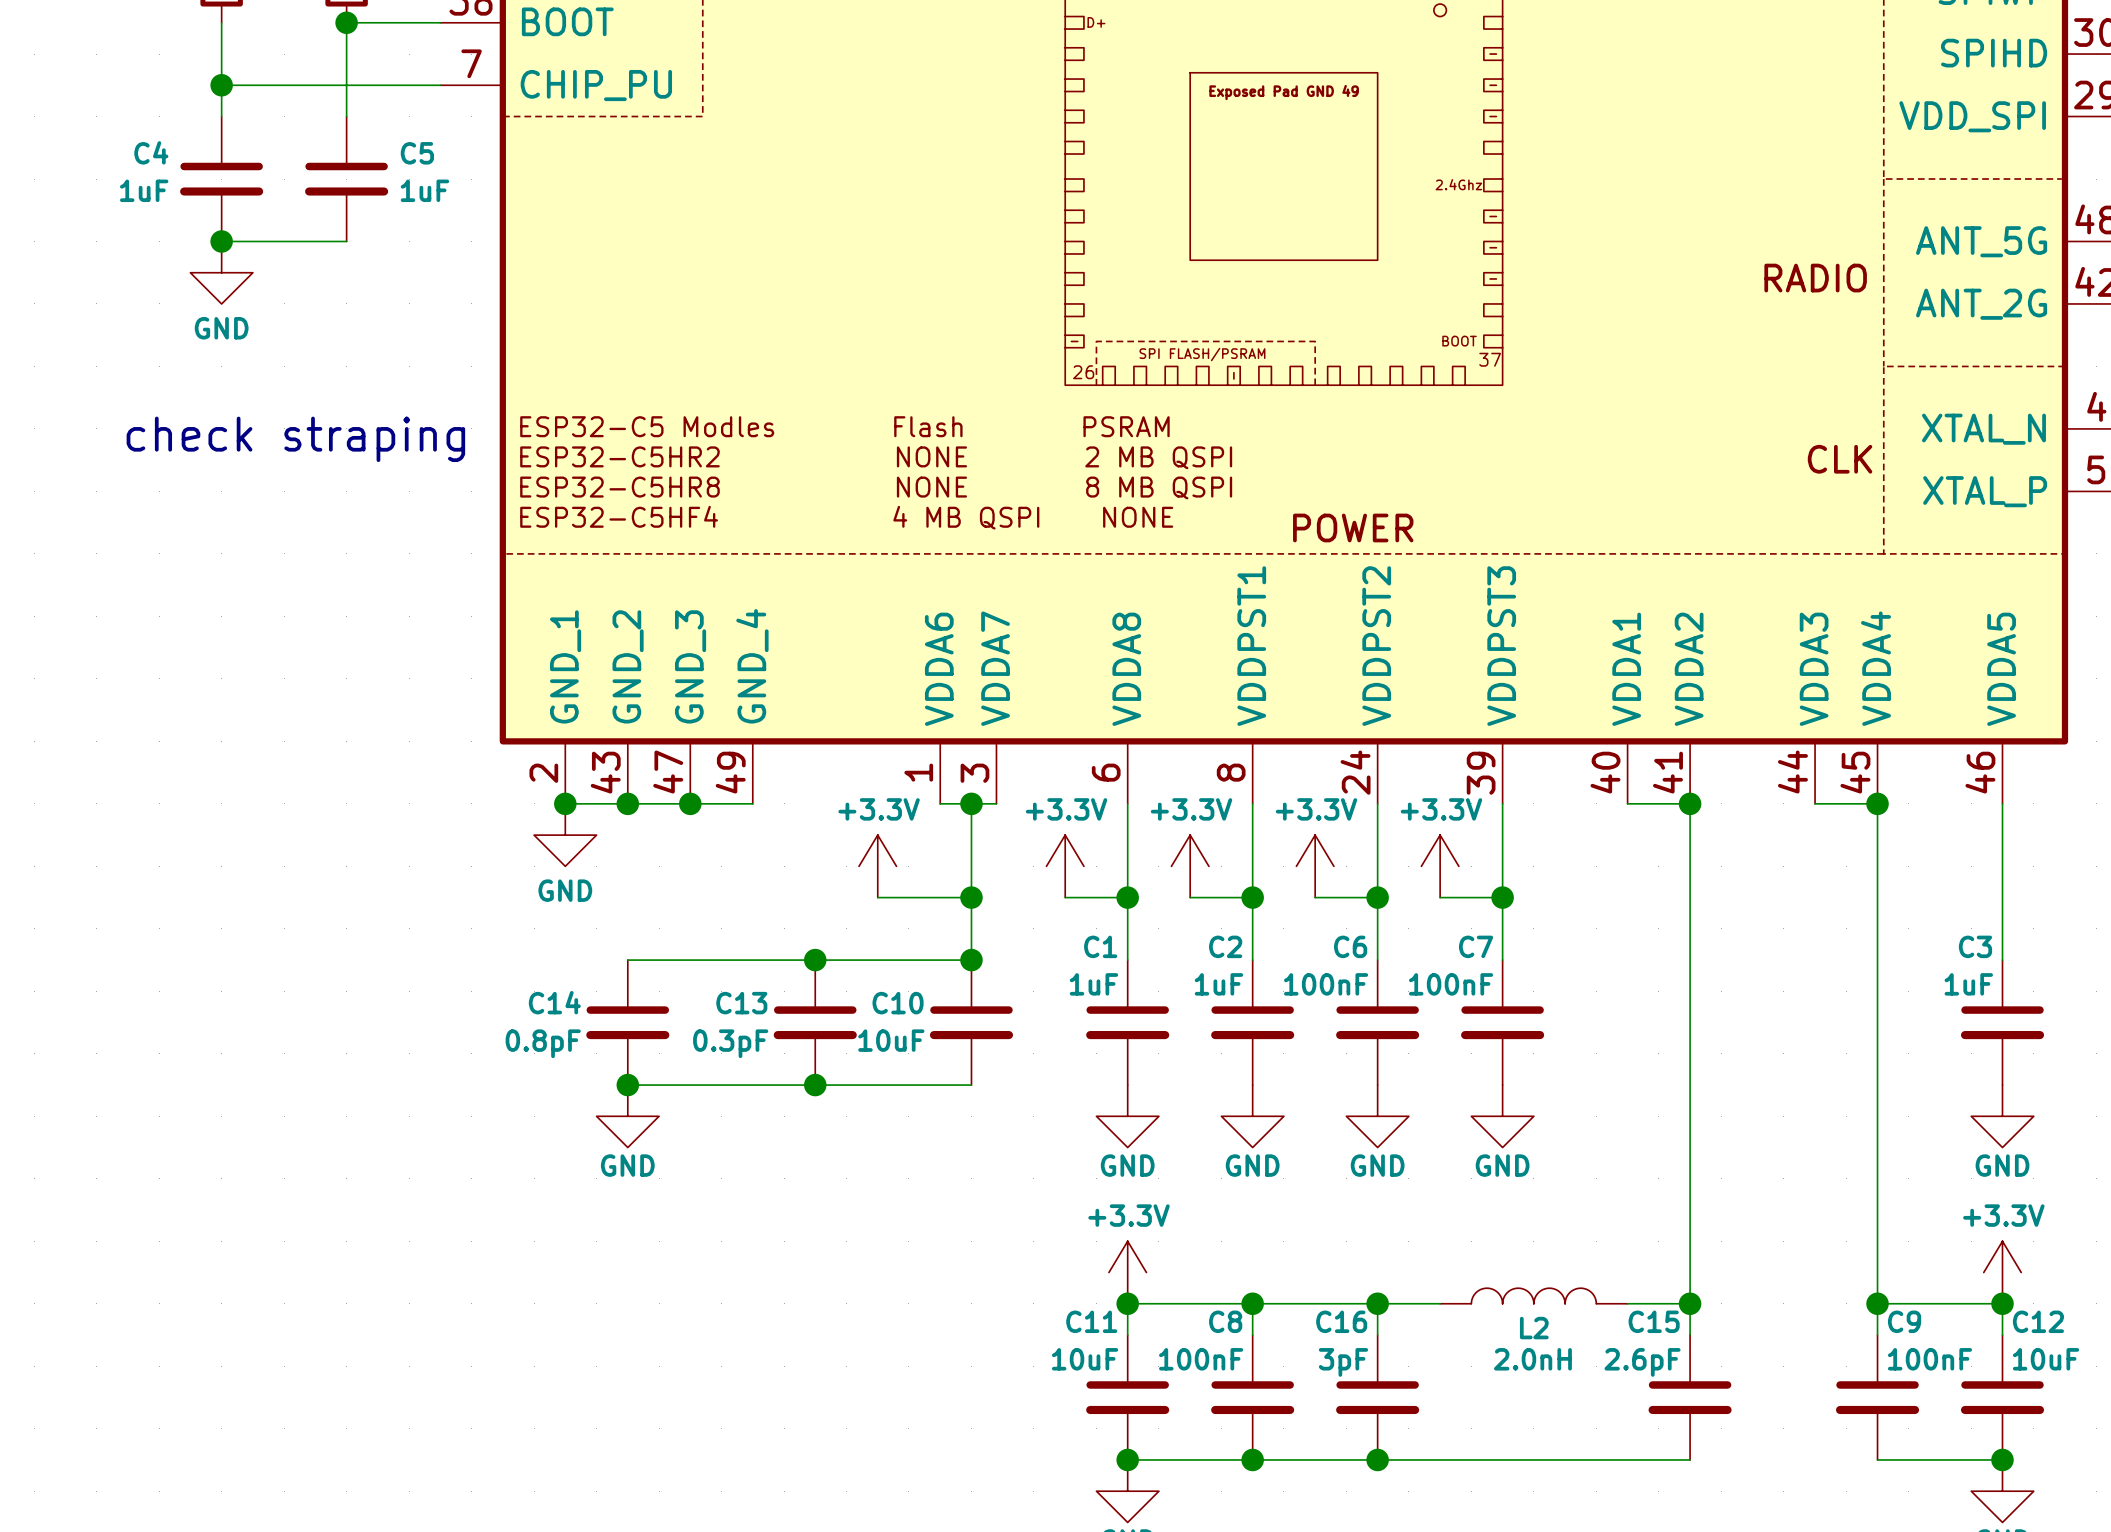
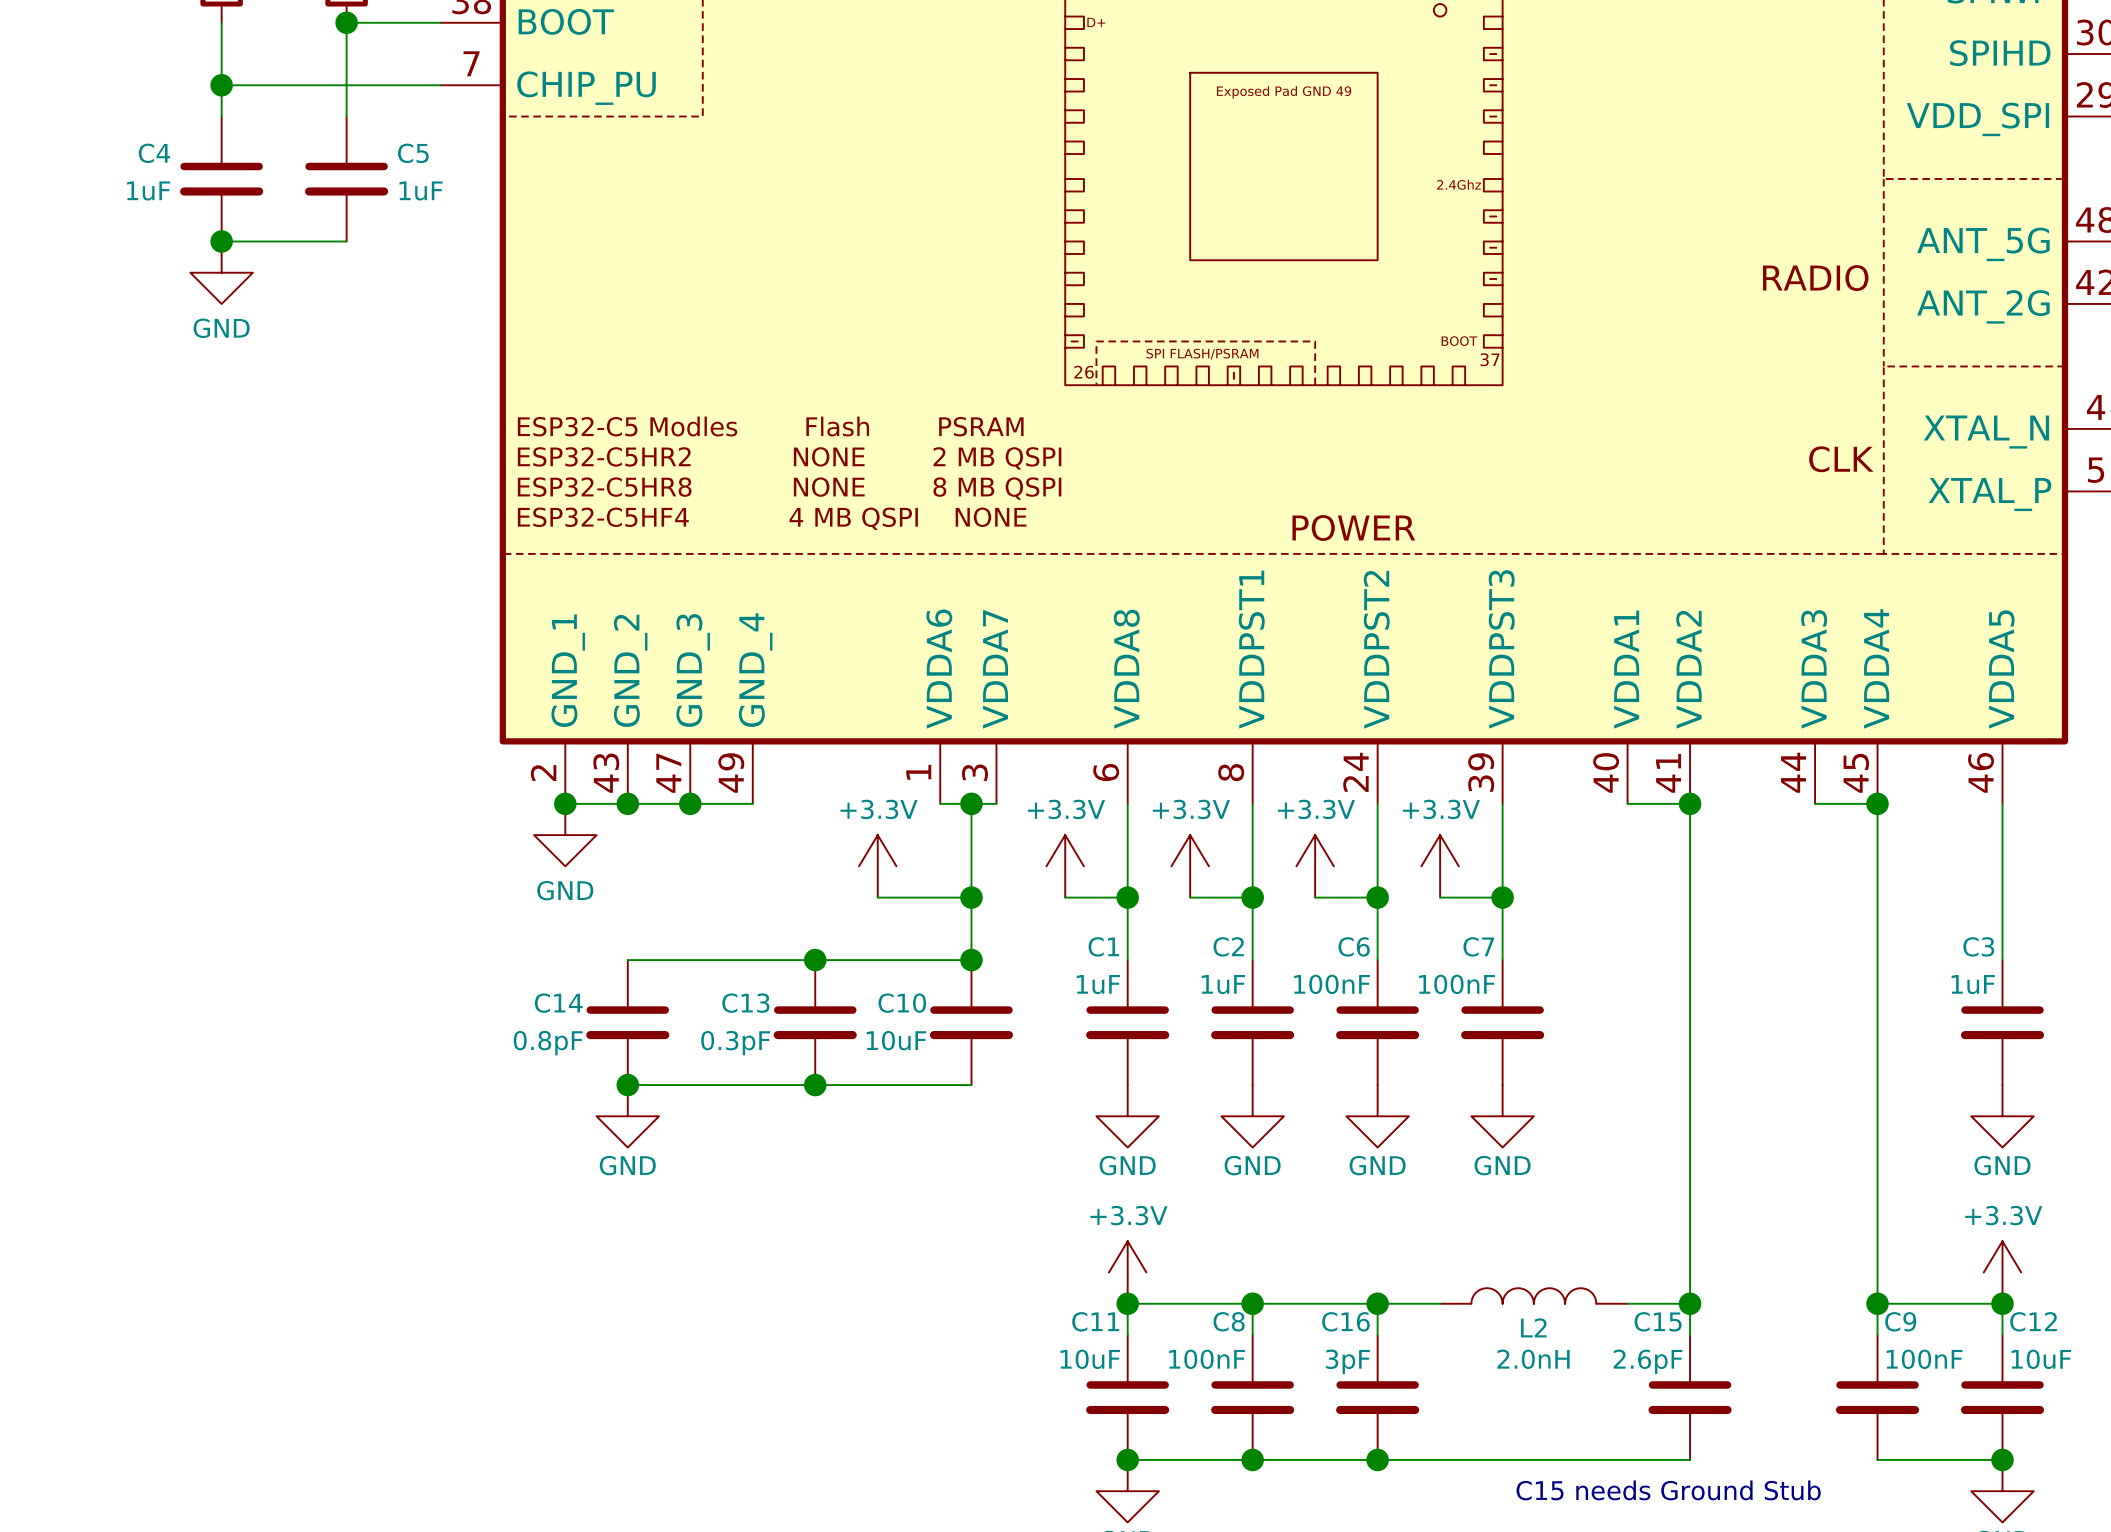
text: check straping (295, 439) -> none
text: none -> C15 needs Ground Stub (1668, 1490)

